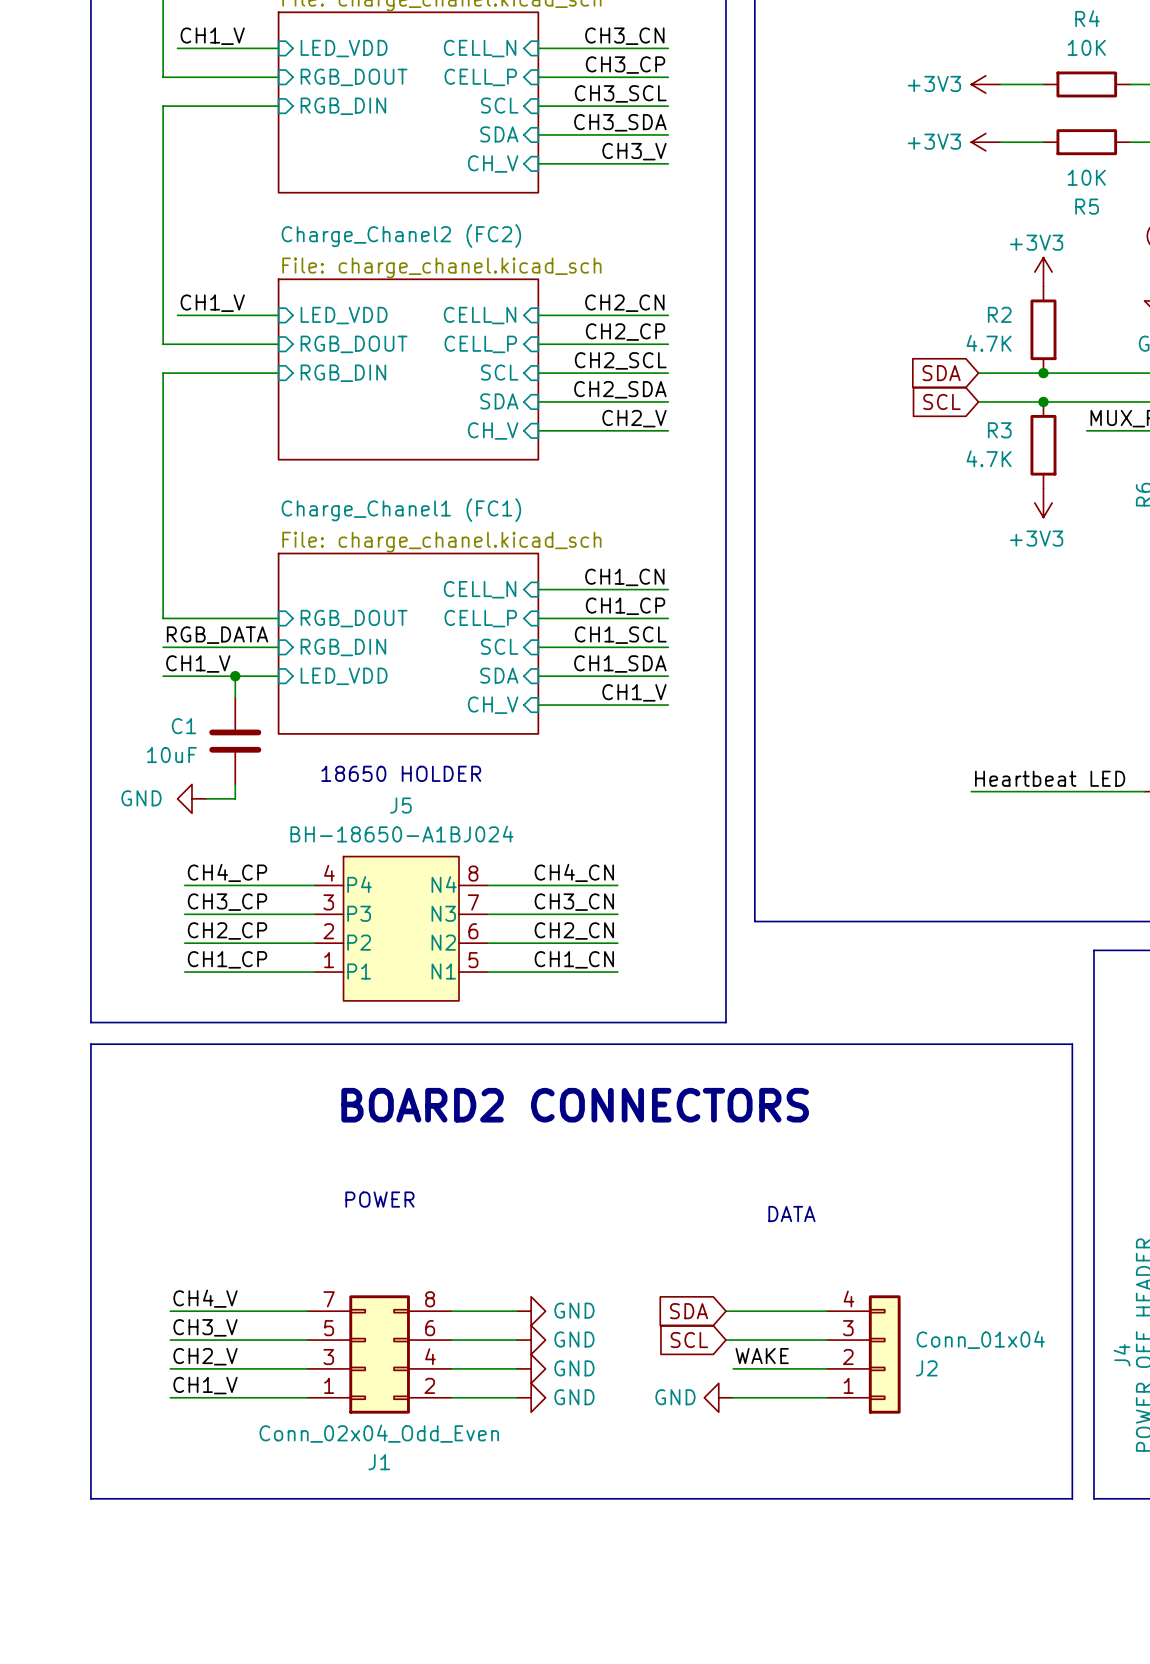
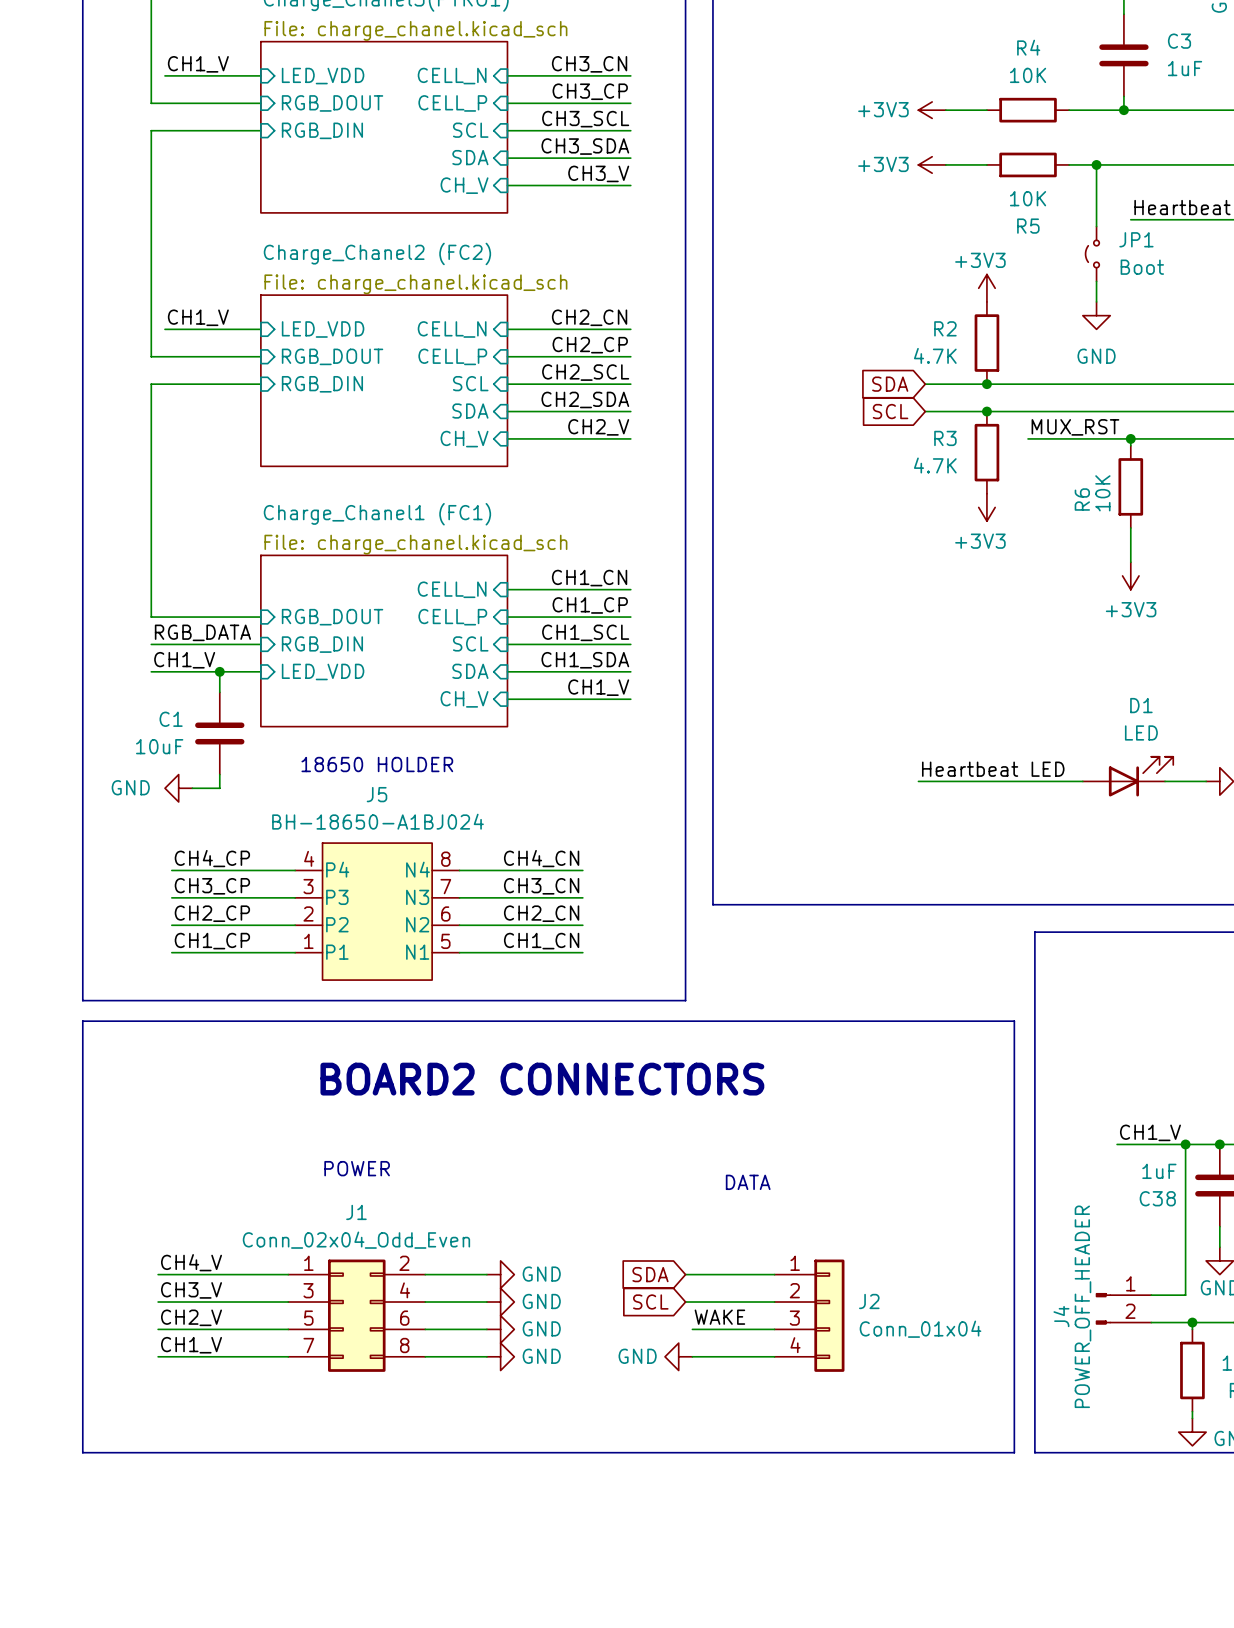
J1 flip: as is (379, 1354) -> up-down (356, 1315)
J2 flip: as is (884, 1354) -> up-down (829, 1315)

